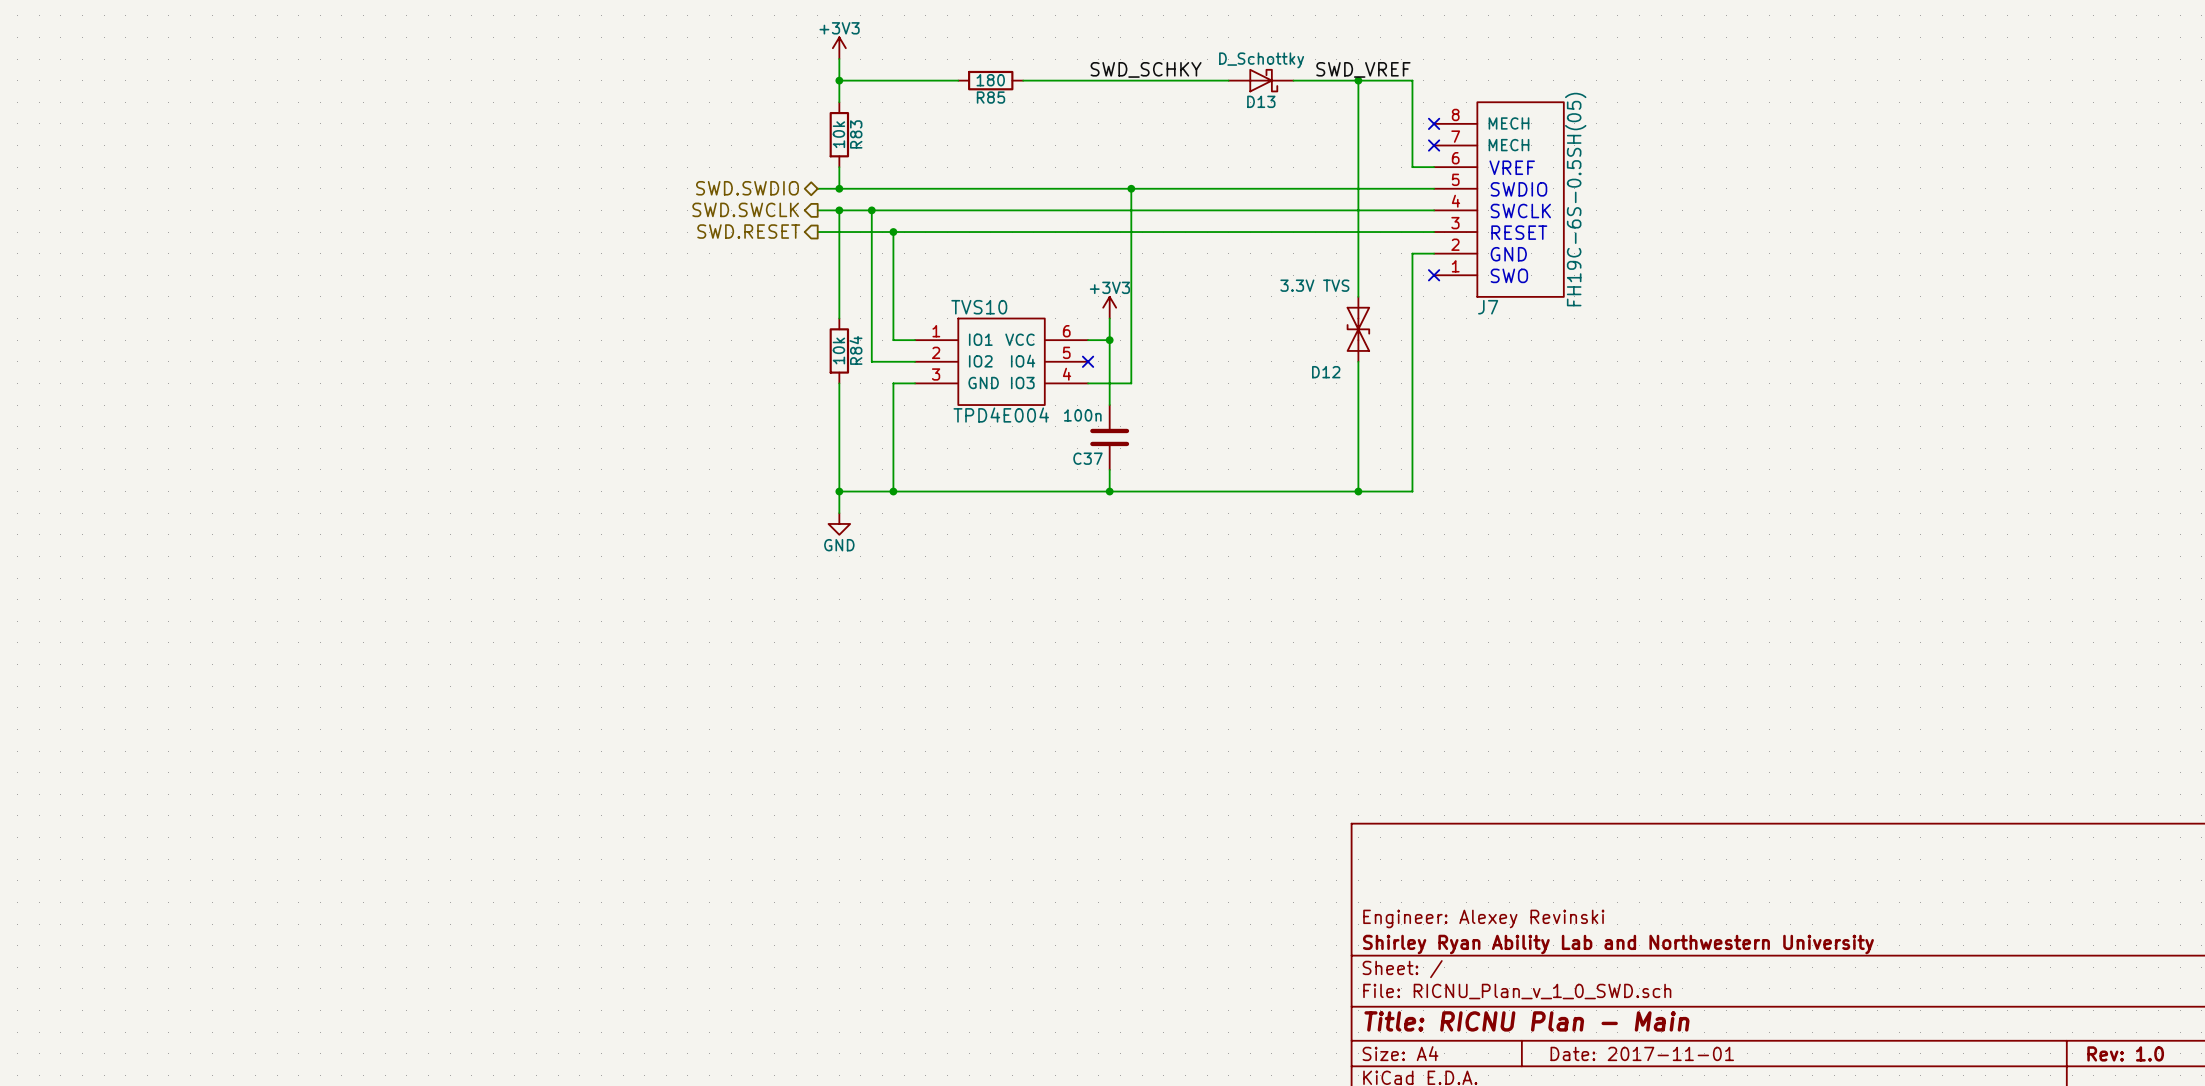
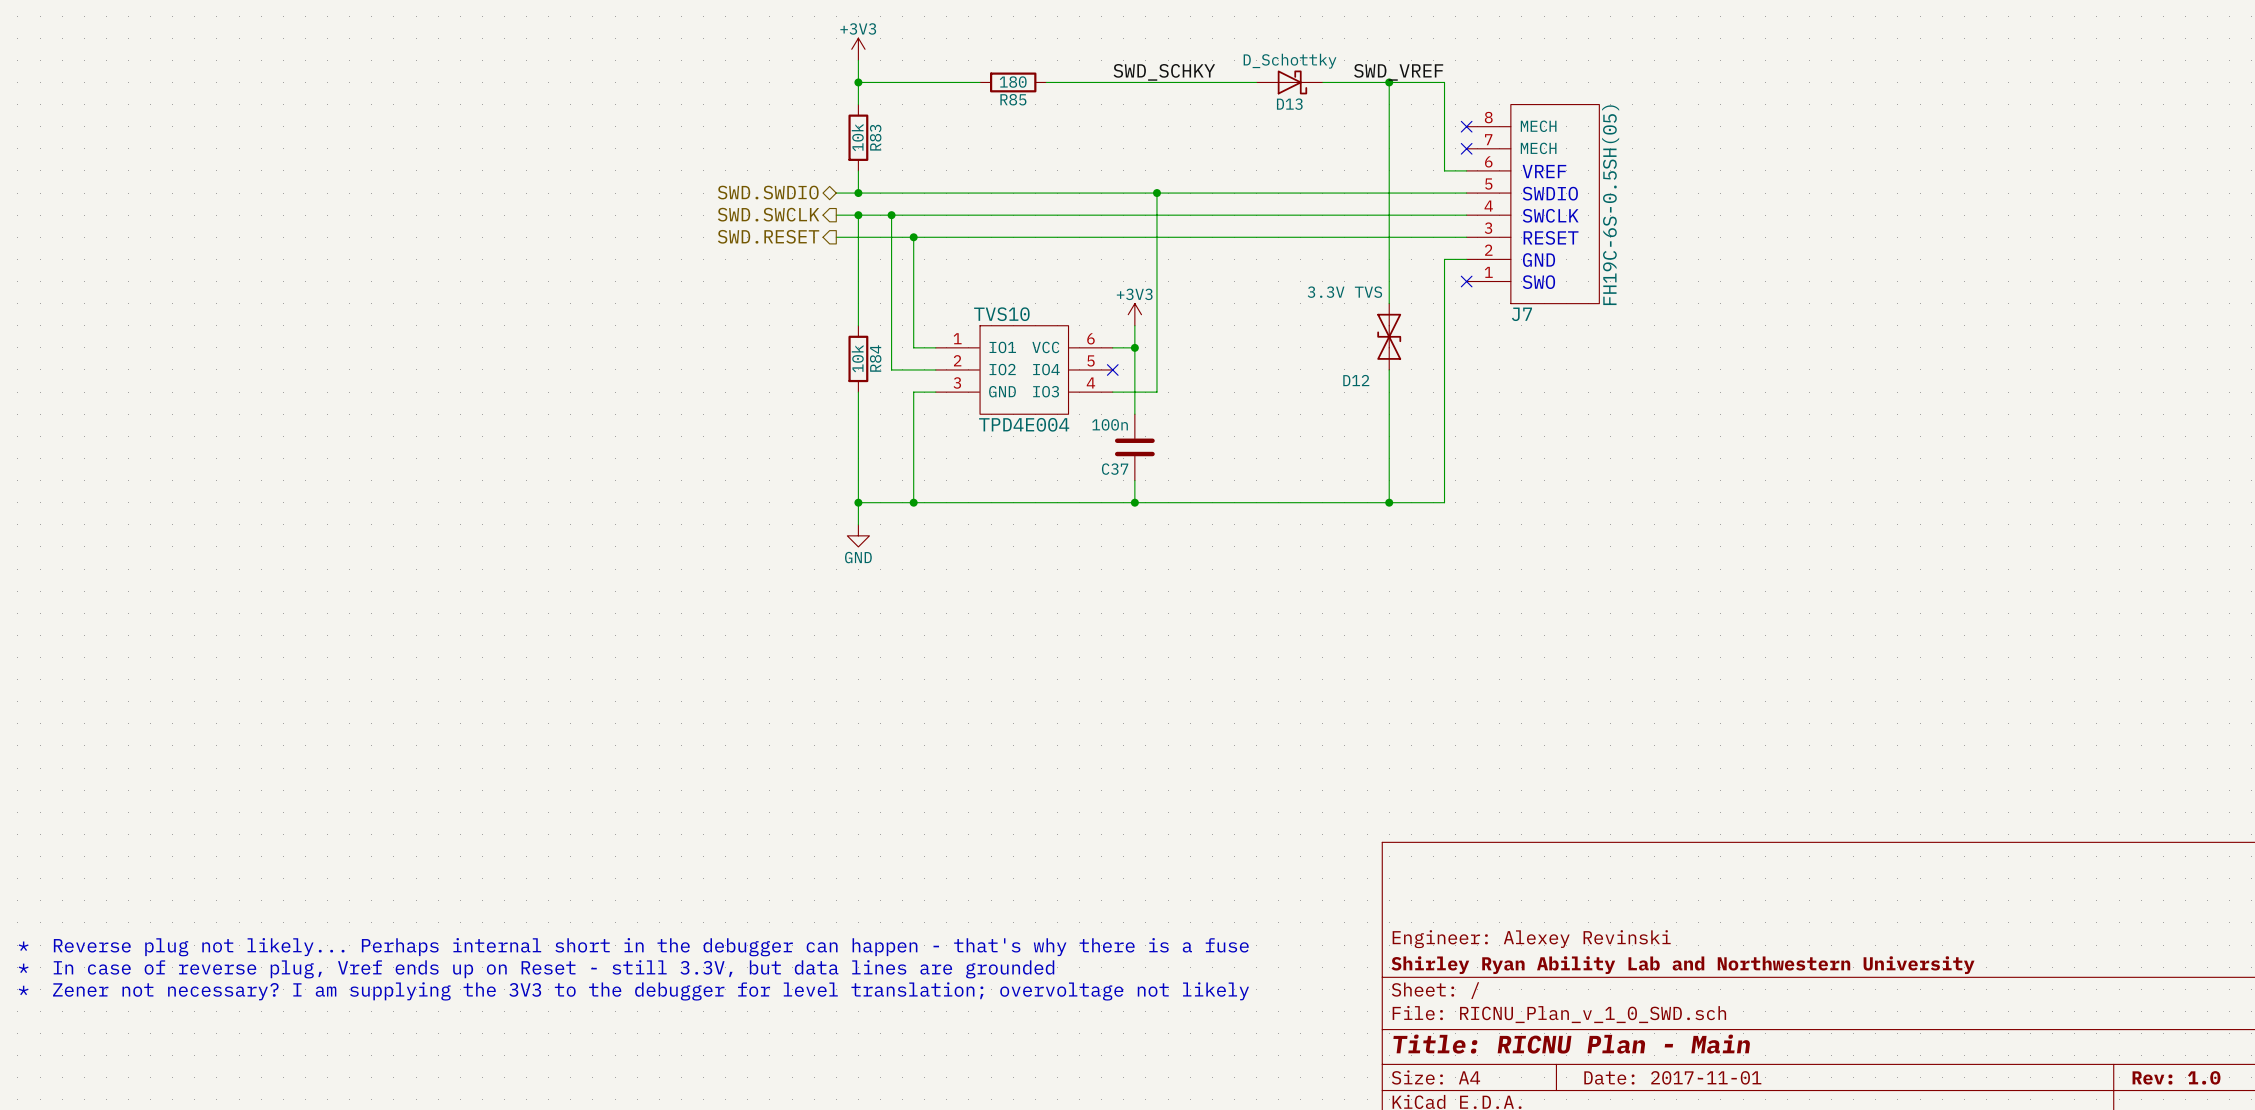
text: none -> * Reverse plug not likely... Perhaps internal short in the debugger can happen - that's why there is a fuse (633, 947)
text: none -> * In case of reverse plug, Vref ends up on Reset - still 3.3V, but data lines are grounded (536, 969)
text: none -> * Zener not necessary? I am supplying the 3V3 to the debugger for level translation; overvoltage not likely (633, 991)

